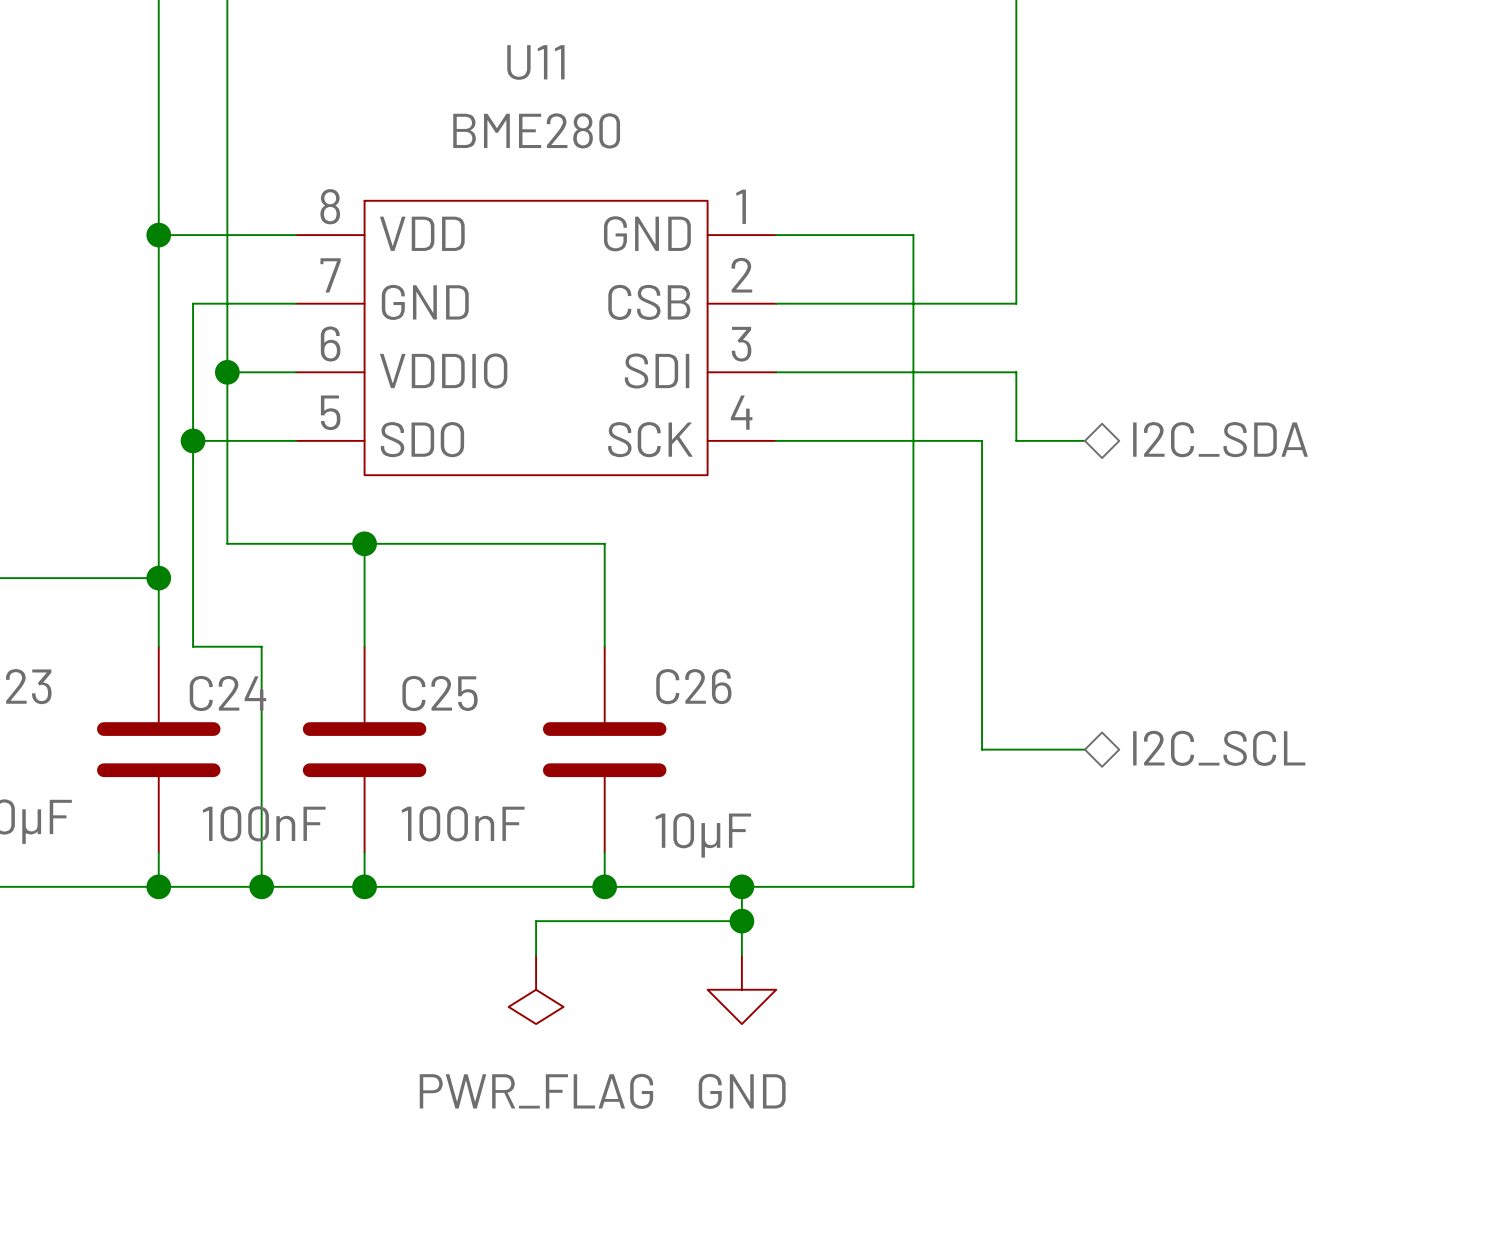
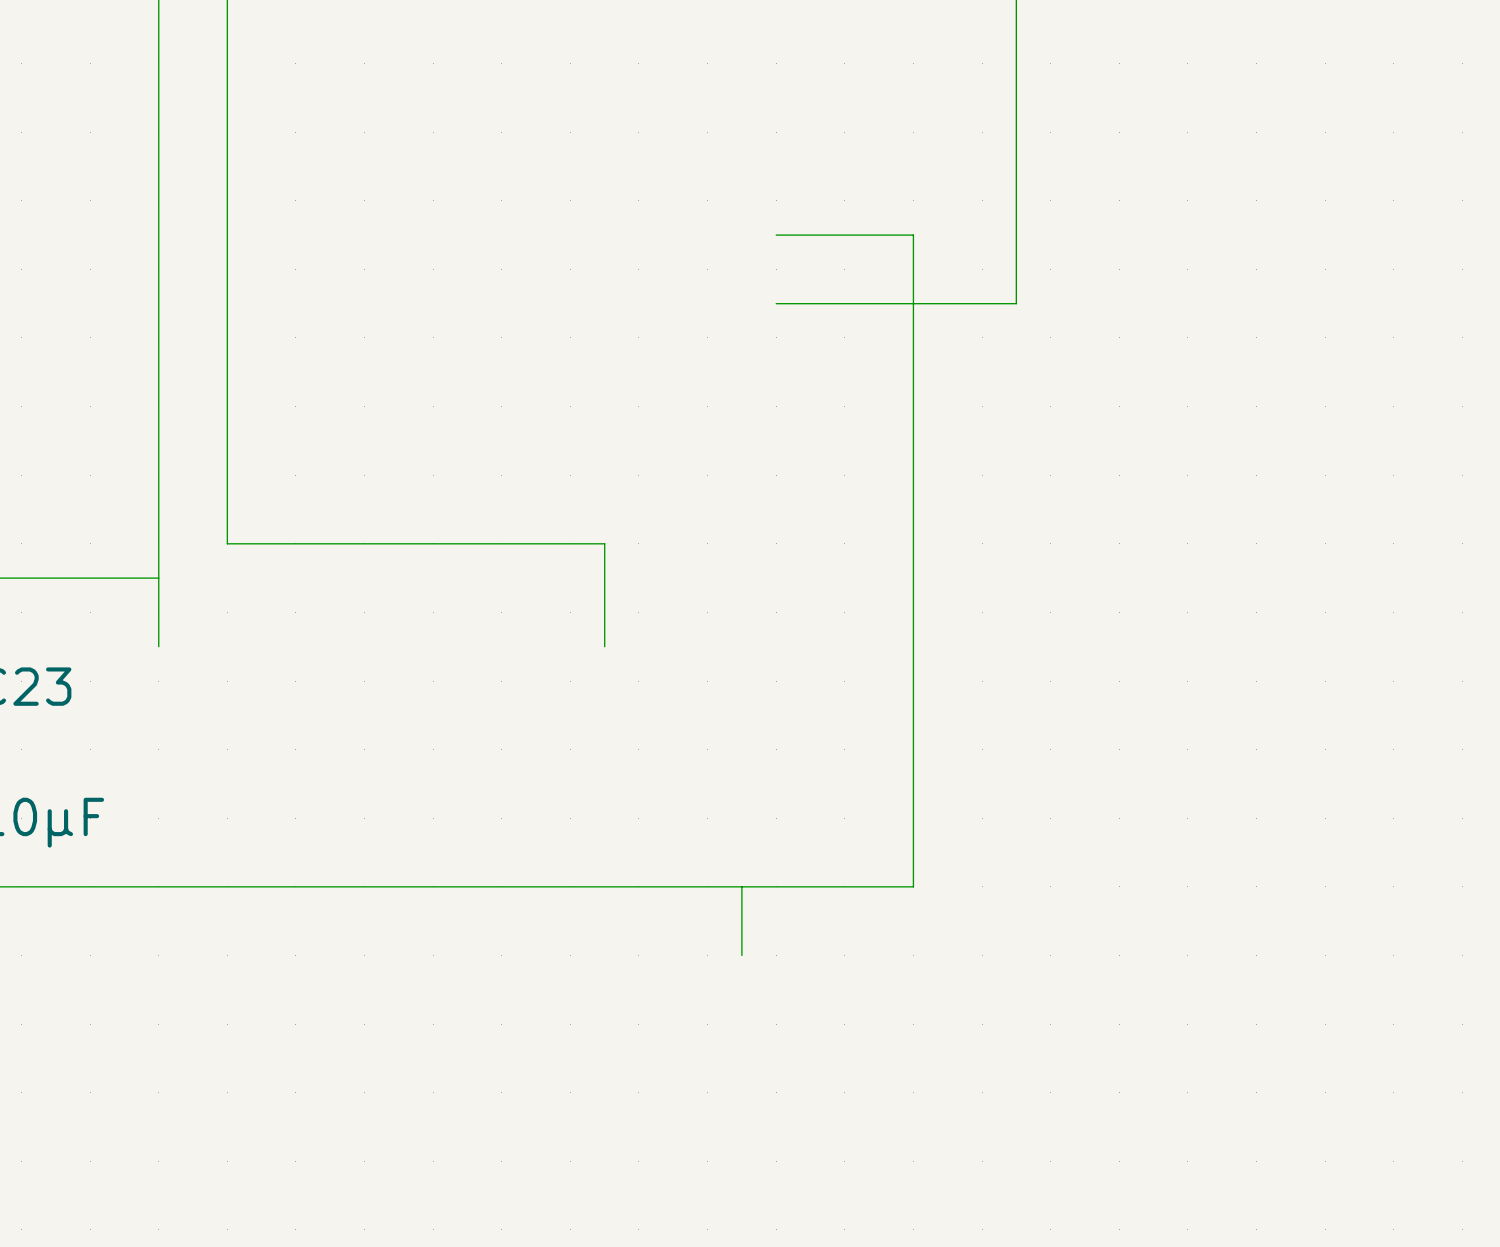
wire: (158, 235) (295, 235) -> none
junction: (158, 235) -> none
wire: (295, 303) (193, 303) (193, 646) (261, 646) (261, 886) -> none
U11: (536, 337) -> none
wire: (227, 372) (295, 372) -> none
junction: (227, 372) -> none
wire: (776, 372) (1016, 372) (1016, 440) (1084, 440) -> none
hierarchical label: I2C_SDA (1220, 439) -> none
wire: (193, 440) (295, 440) -> none
junction: (193, 440) -> none
wire: (776, 440) (982, 440) (982, 749) (1084, 749) -> none
wire: (364, 543) (364, 646) -> none
junction: (364, 543) -> none
junction: (158, 578) -> none
hierarchical label: I2C_SCL (1219, 748) -> none
C24: 100nF (158, 749) -> none
C25: 100nF (364, 749) -> none
C26: 10μF (604, 749) -> none
wire: (158, 852) (158, 886) -> none
wire: (364, 852) (364, 886) -> none
wire: (604, 852) (604, 886) -> none
junction: (158, 886) -> none
junction: (261, 886) -> none
junction: (364, 886) -> none
junction: (604, 886) -> none
junction: (741, 886) -> none
wire: (741, 921) (536, 921) (536, 955) -> none
junction: (741, 921) -> none
power symbol: PWR_FLAG (536, 989) -> none
power symbol: GND (741, 989) -> none

